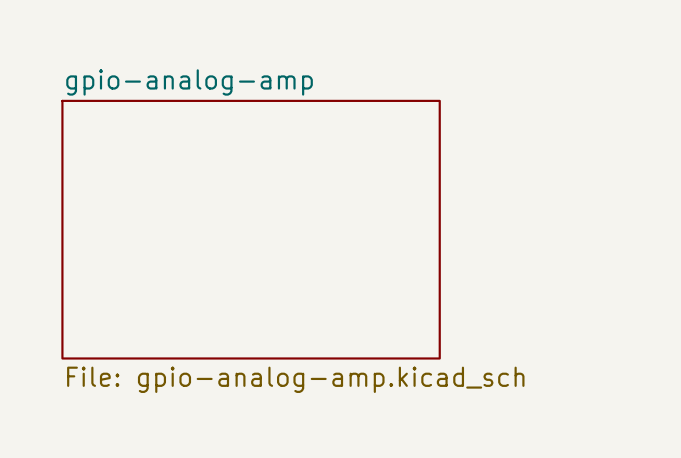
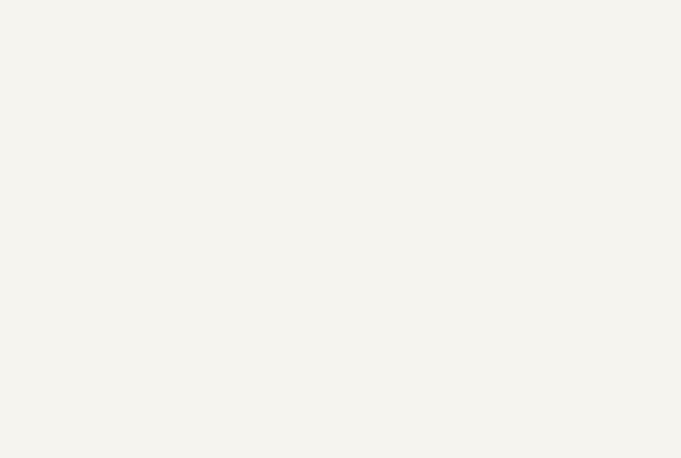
sheet gpio-analog-amp: File: gpio-analog-amp.kicad_sch (251, 229) -> none

